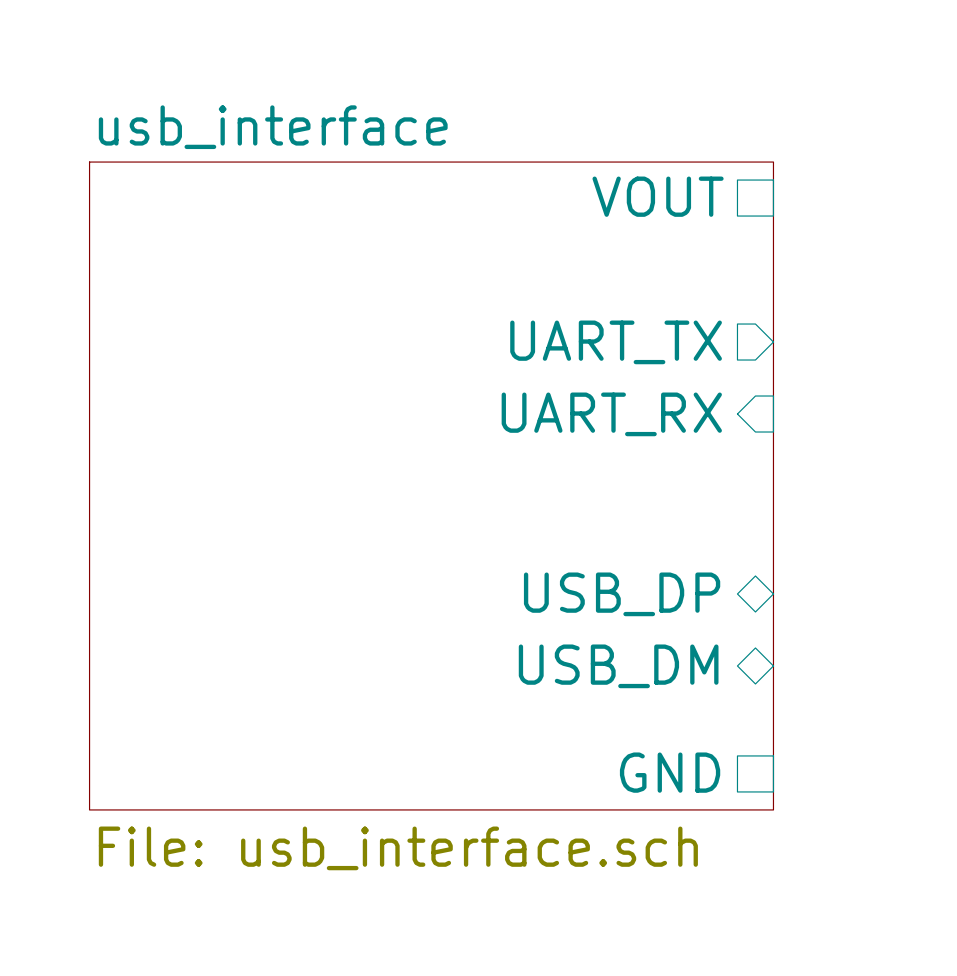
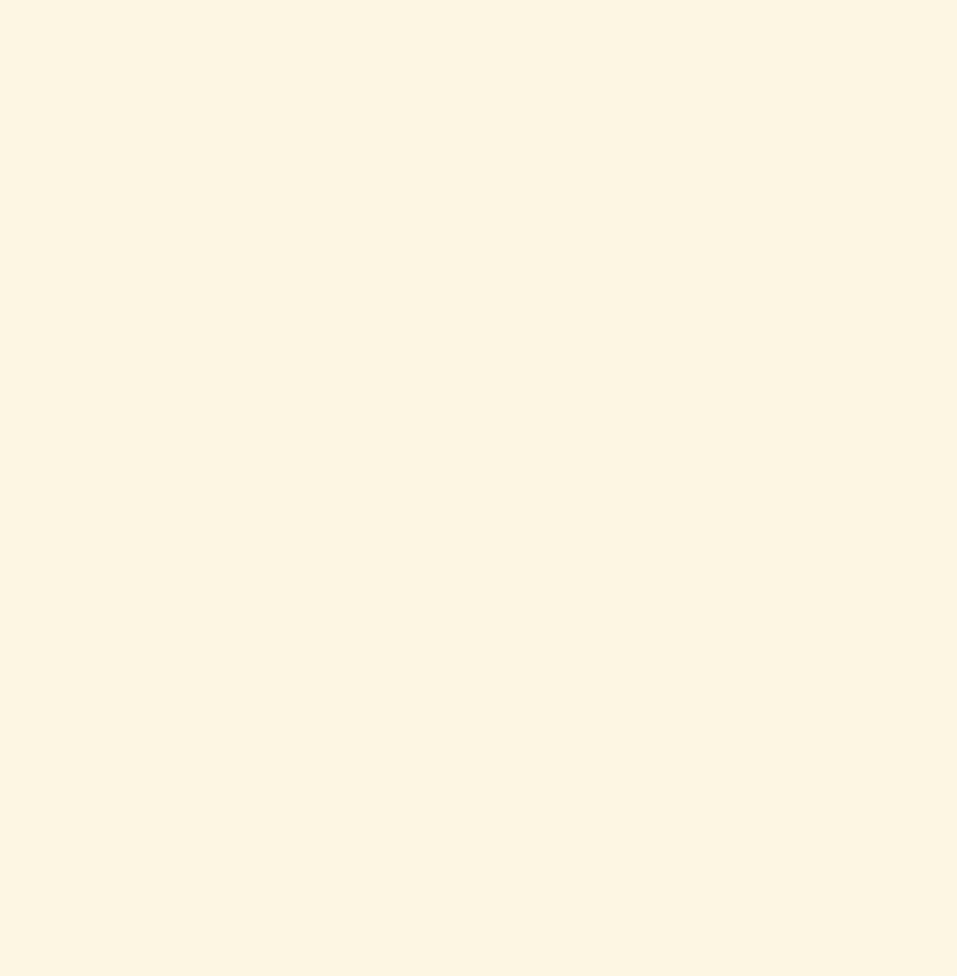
sheet pin: VOUT (658, 196) -> none
sheet pin: UART_TX (616, 342) -> none
sheet pin: UART_RX (611, 414) -> none
sheet usb_interface: File: usb_interface.sch (431, 486) -> none
sheet pin: USB_DP (622, 594) -> none
sheet pin: USB_DM (618, 666) -> none
sheet pin: GND (670, 772) -> none

